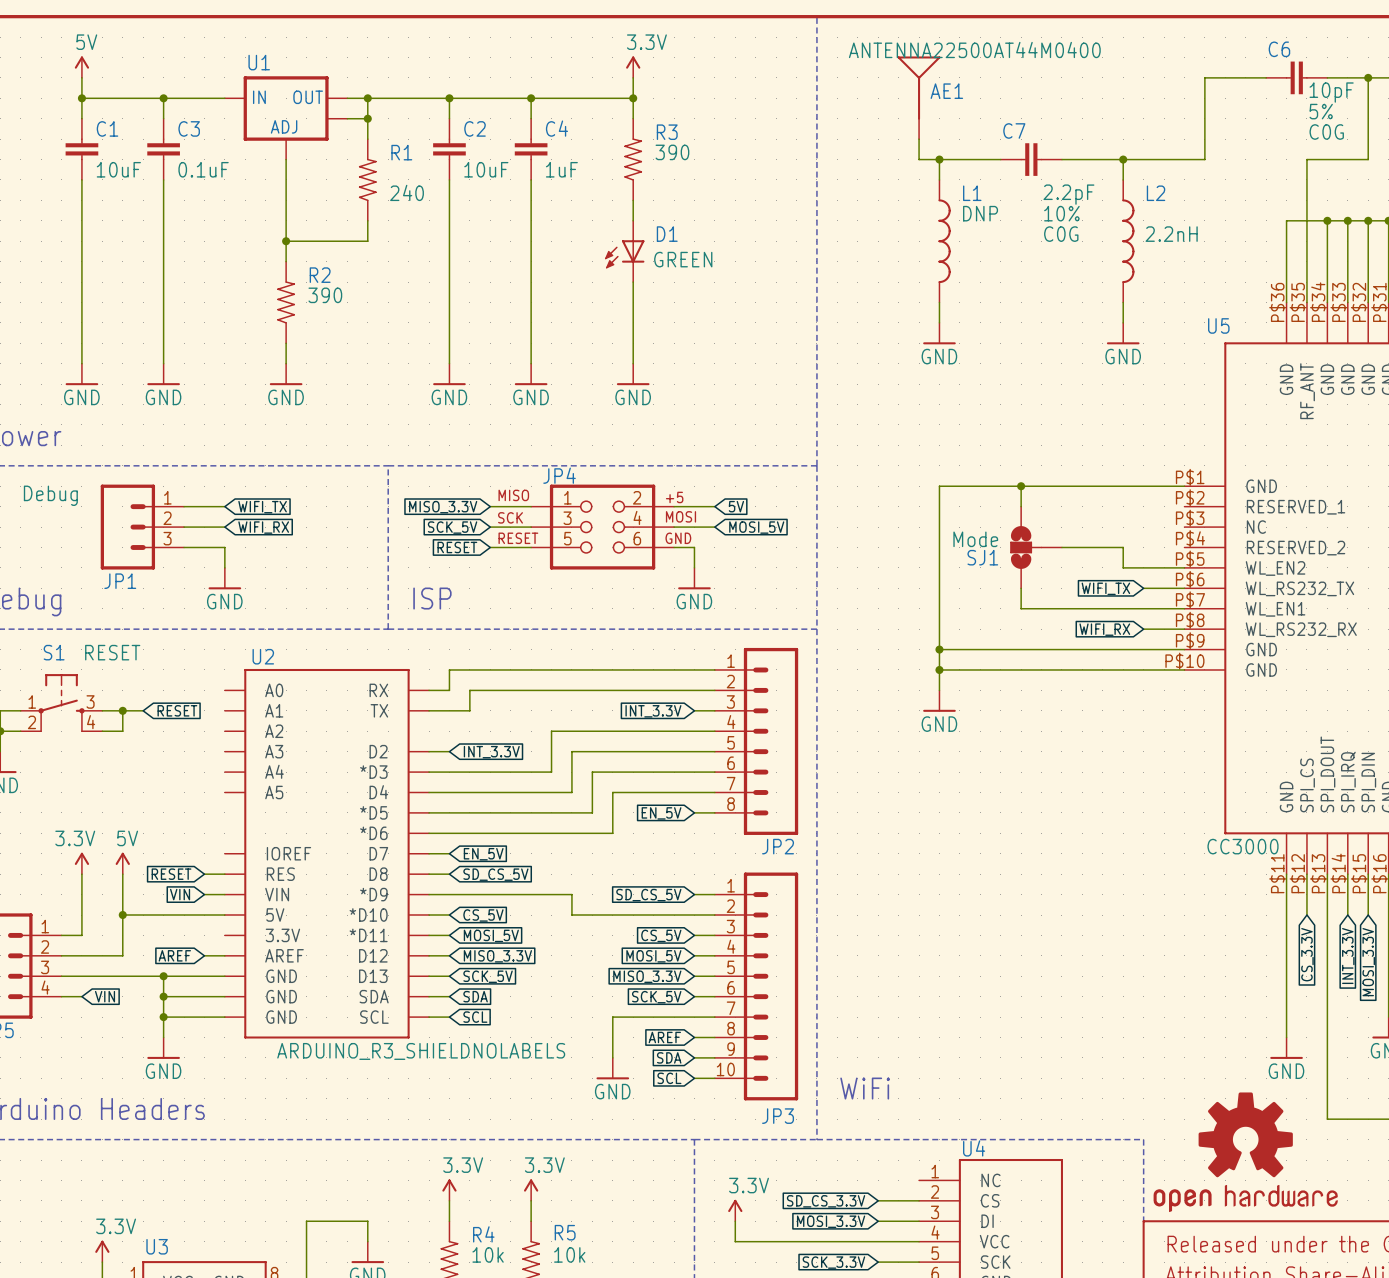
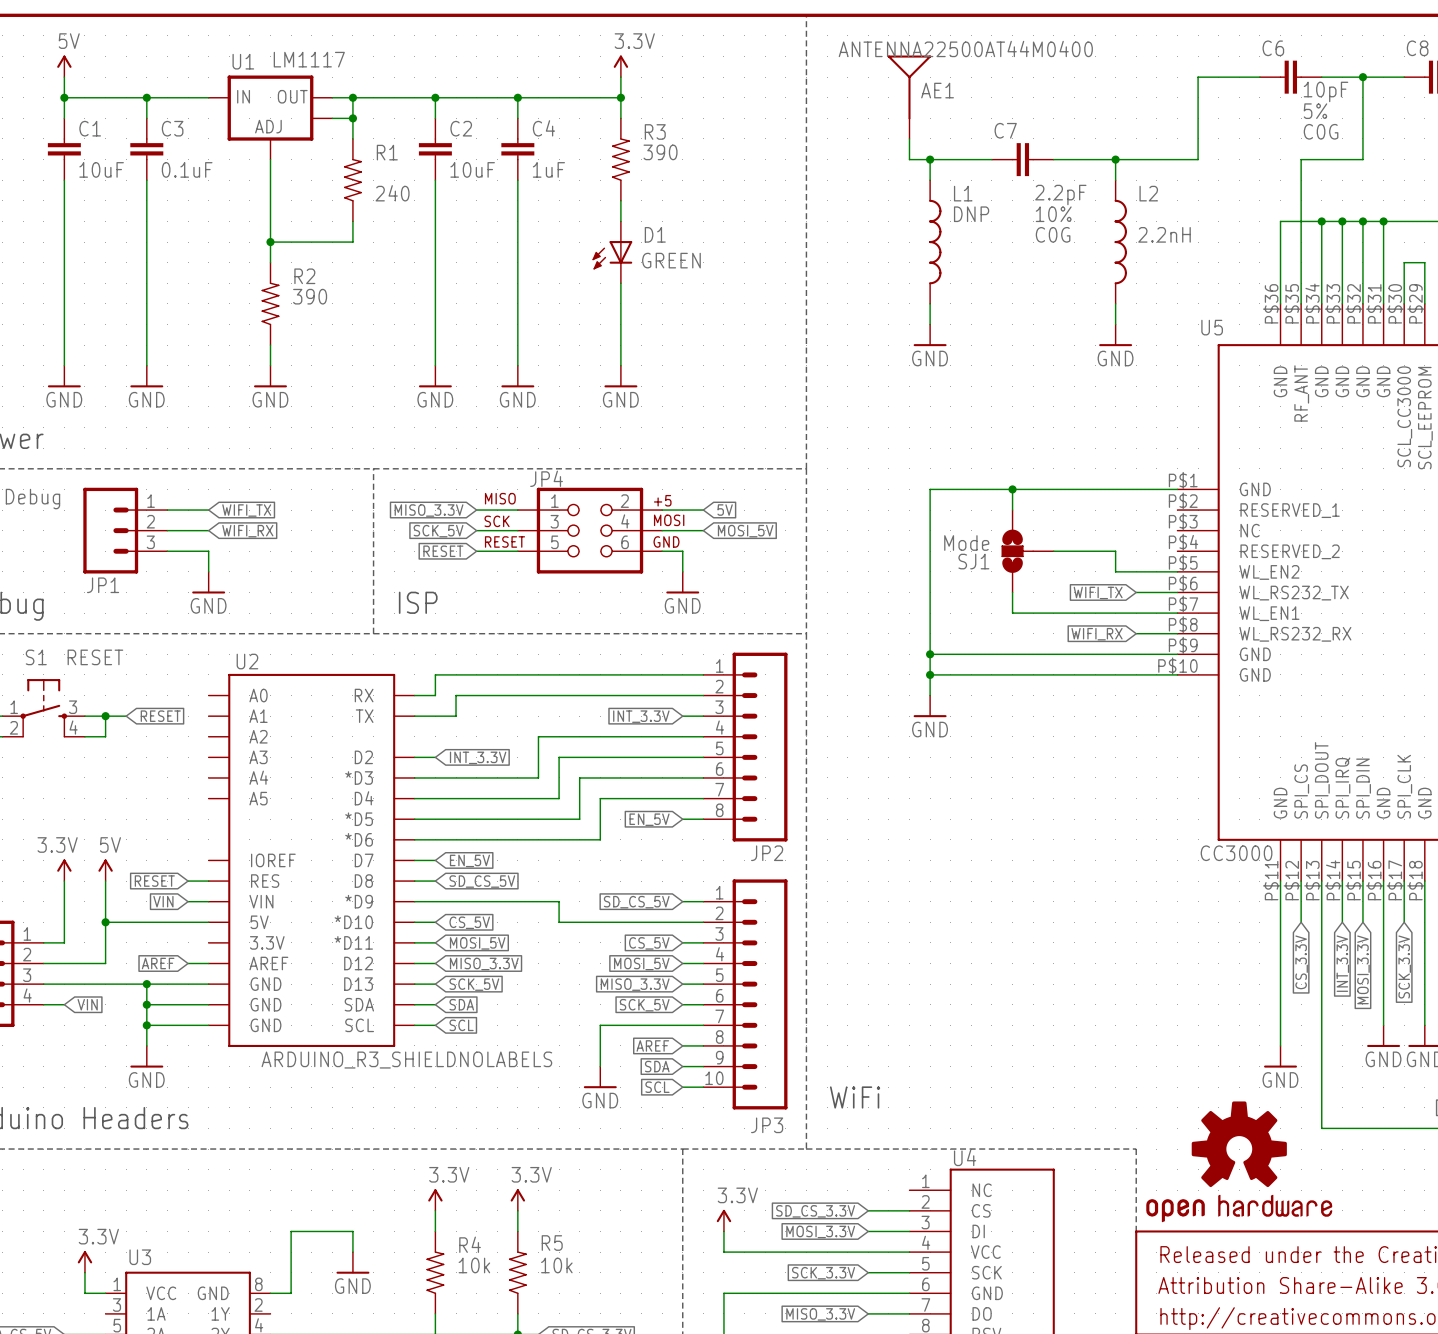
U1 value: none -> LM1117 (309, 59)

